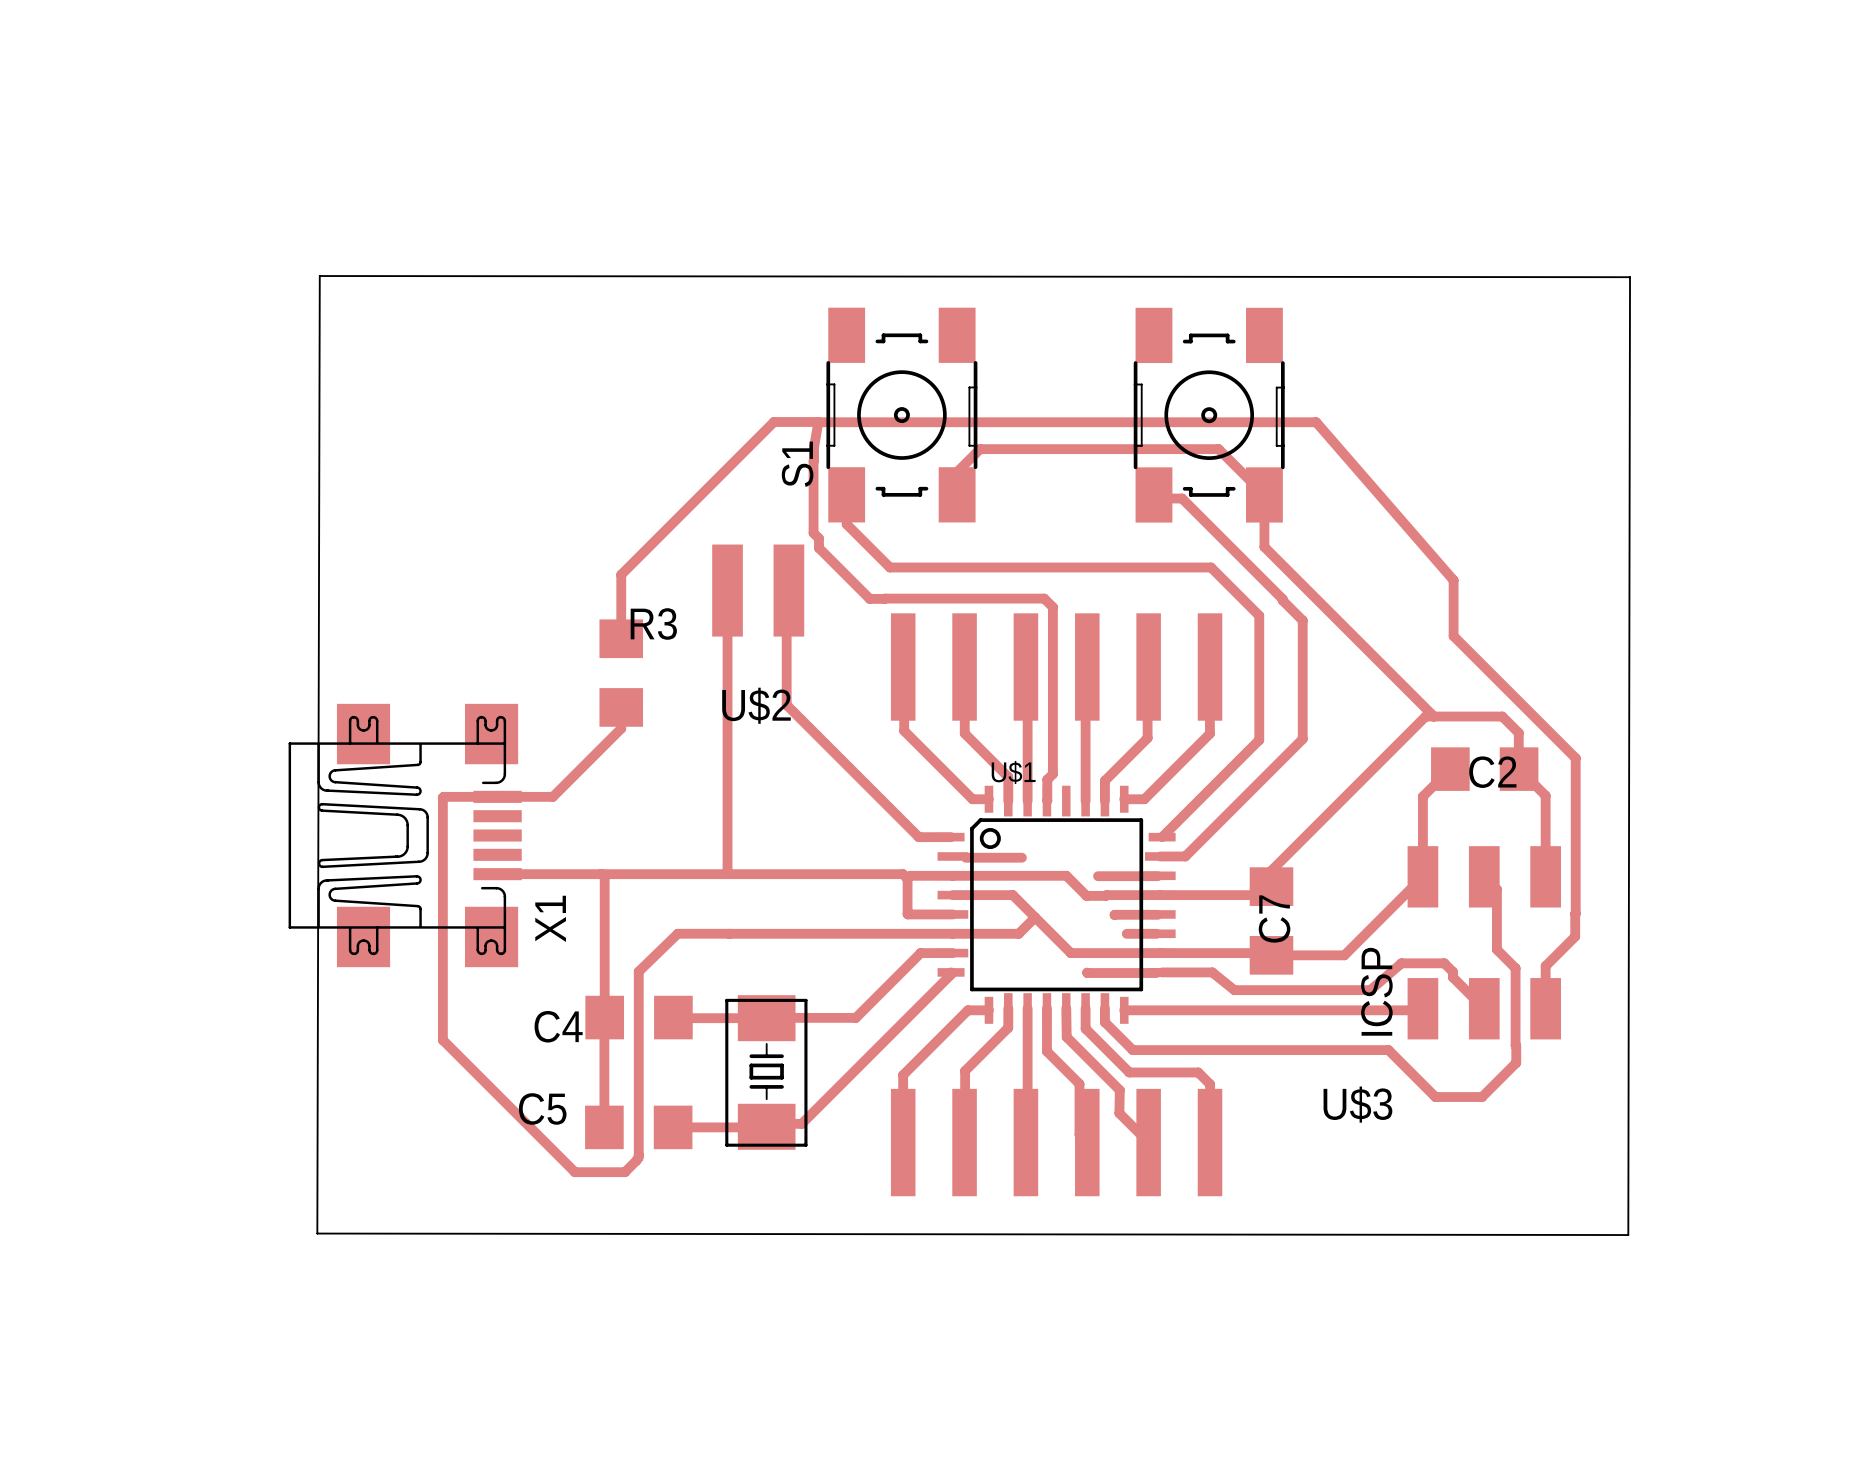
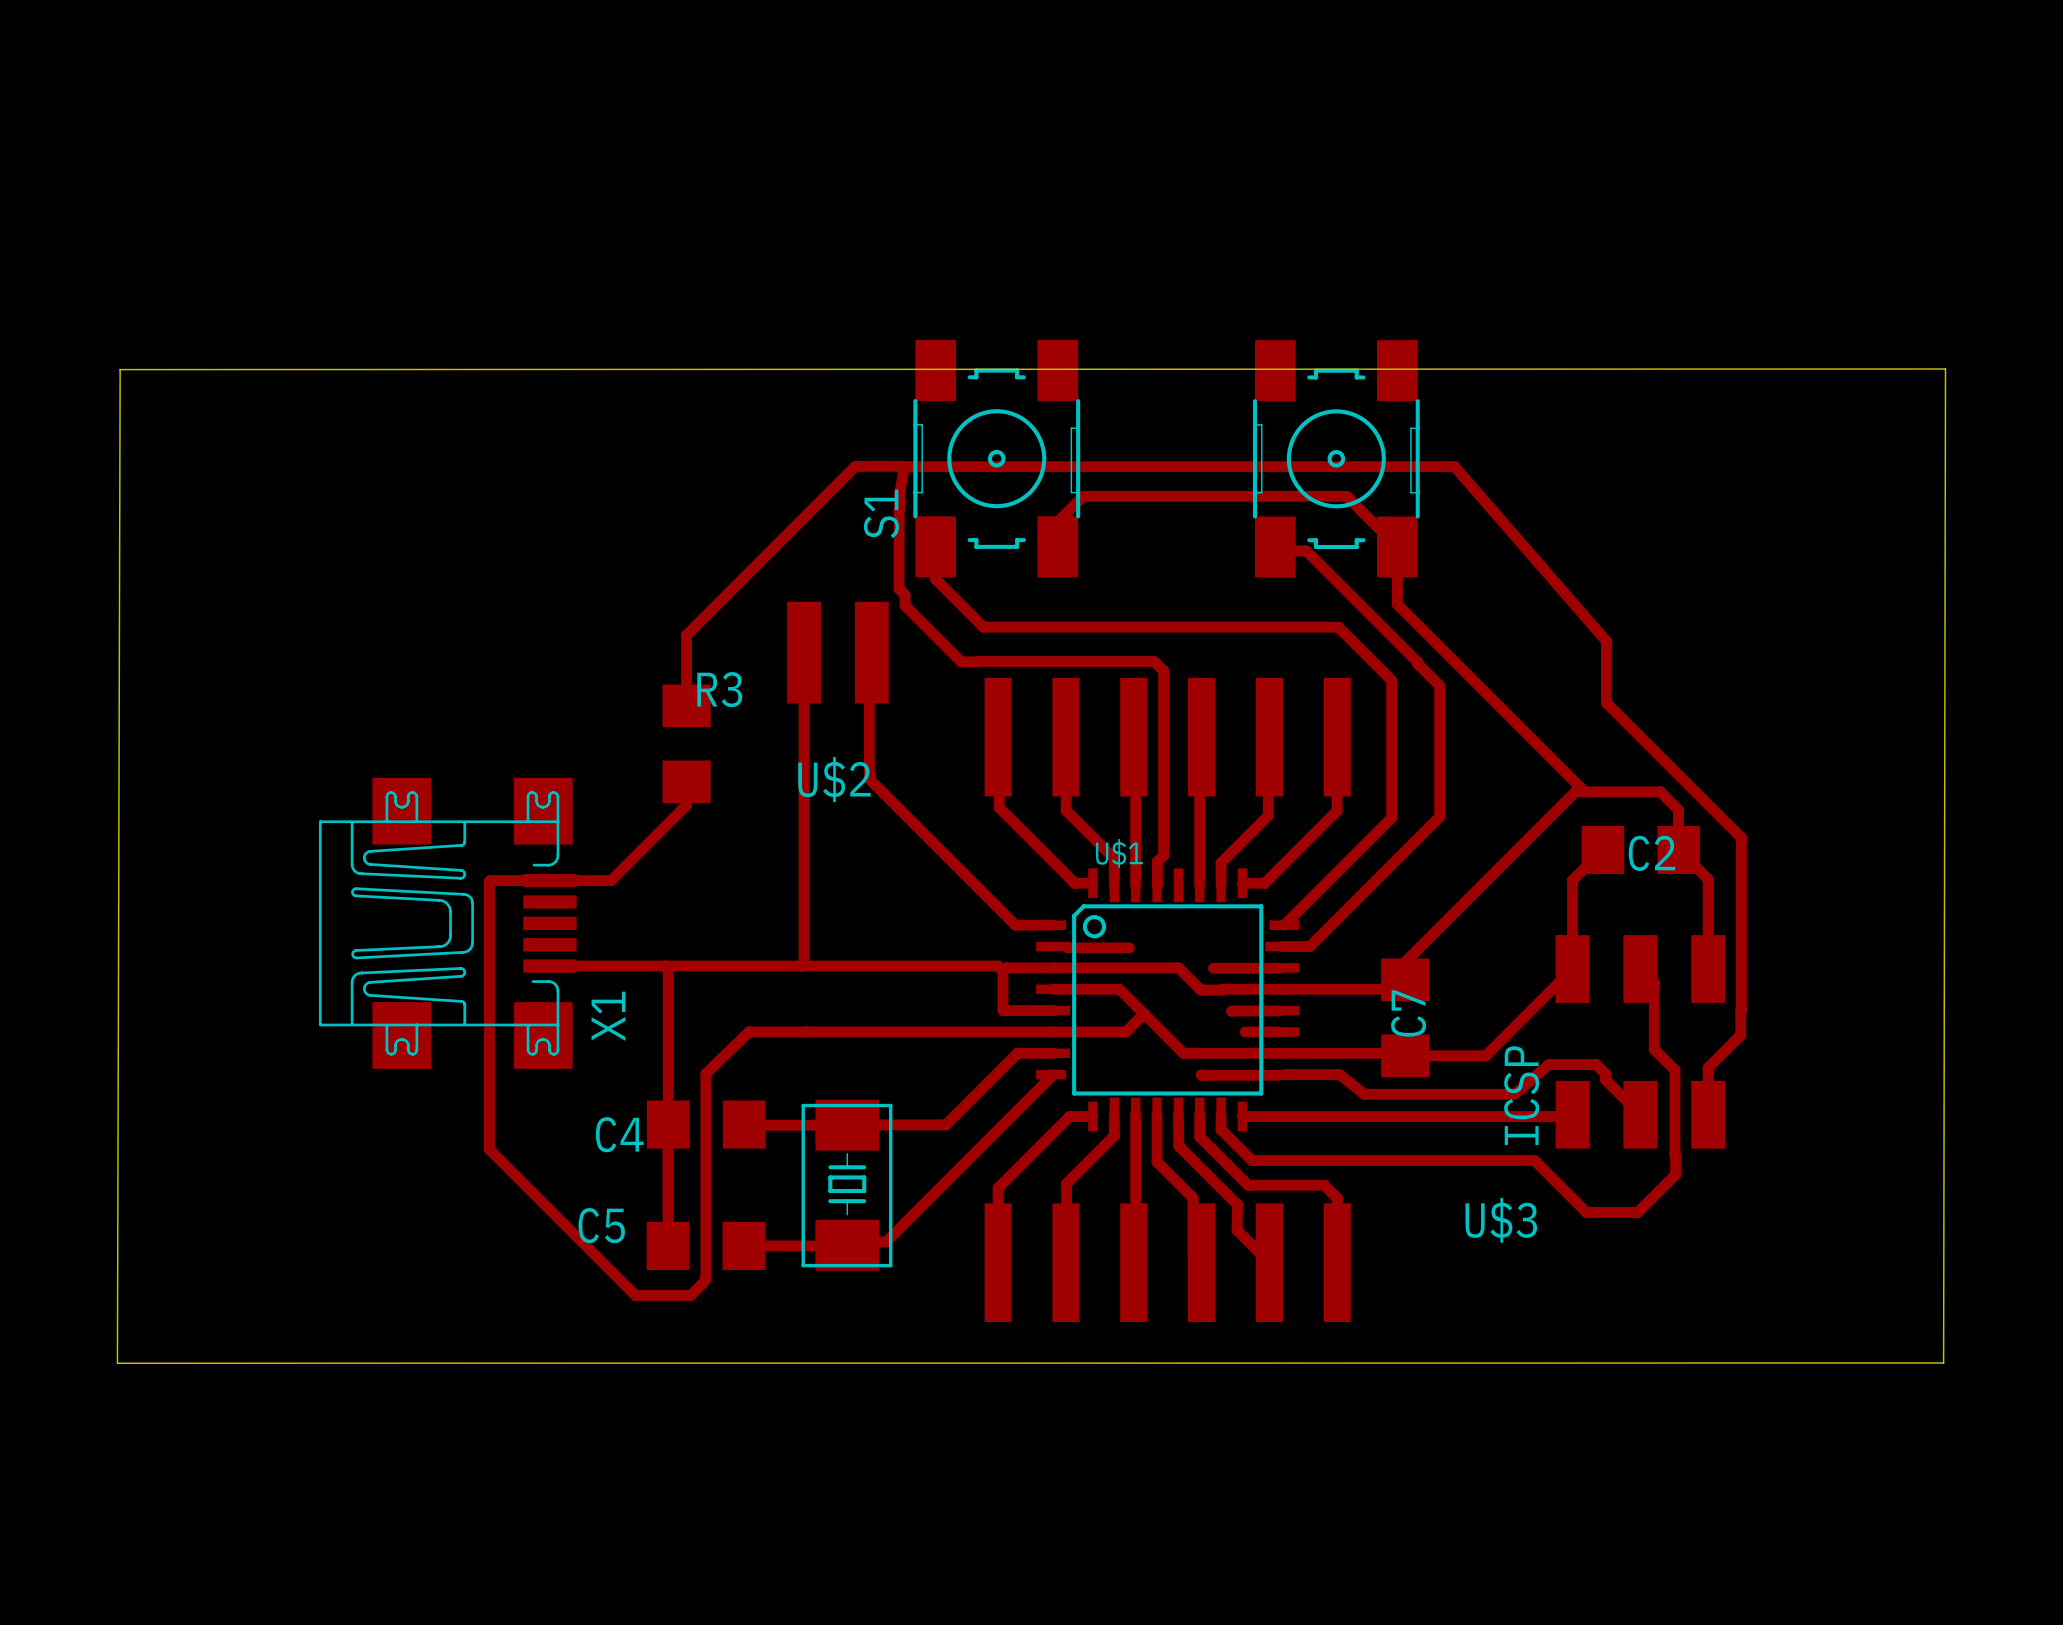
board edge: (319, 276) (1630, 277) (1628, 1235) (317, 1233) (319, 276) -> (1945, 368) (120, 369) (117, 1363) (1943, 1362) (1945, 368)

